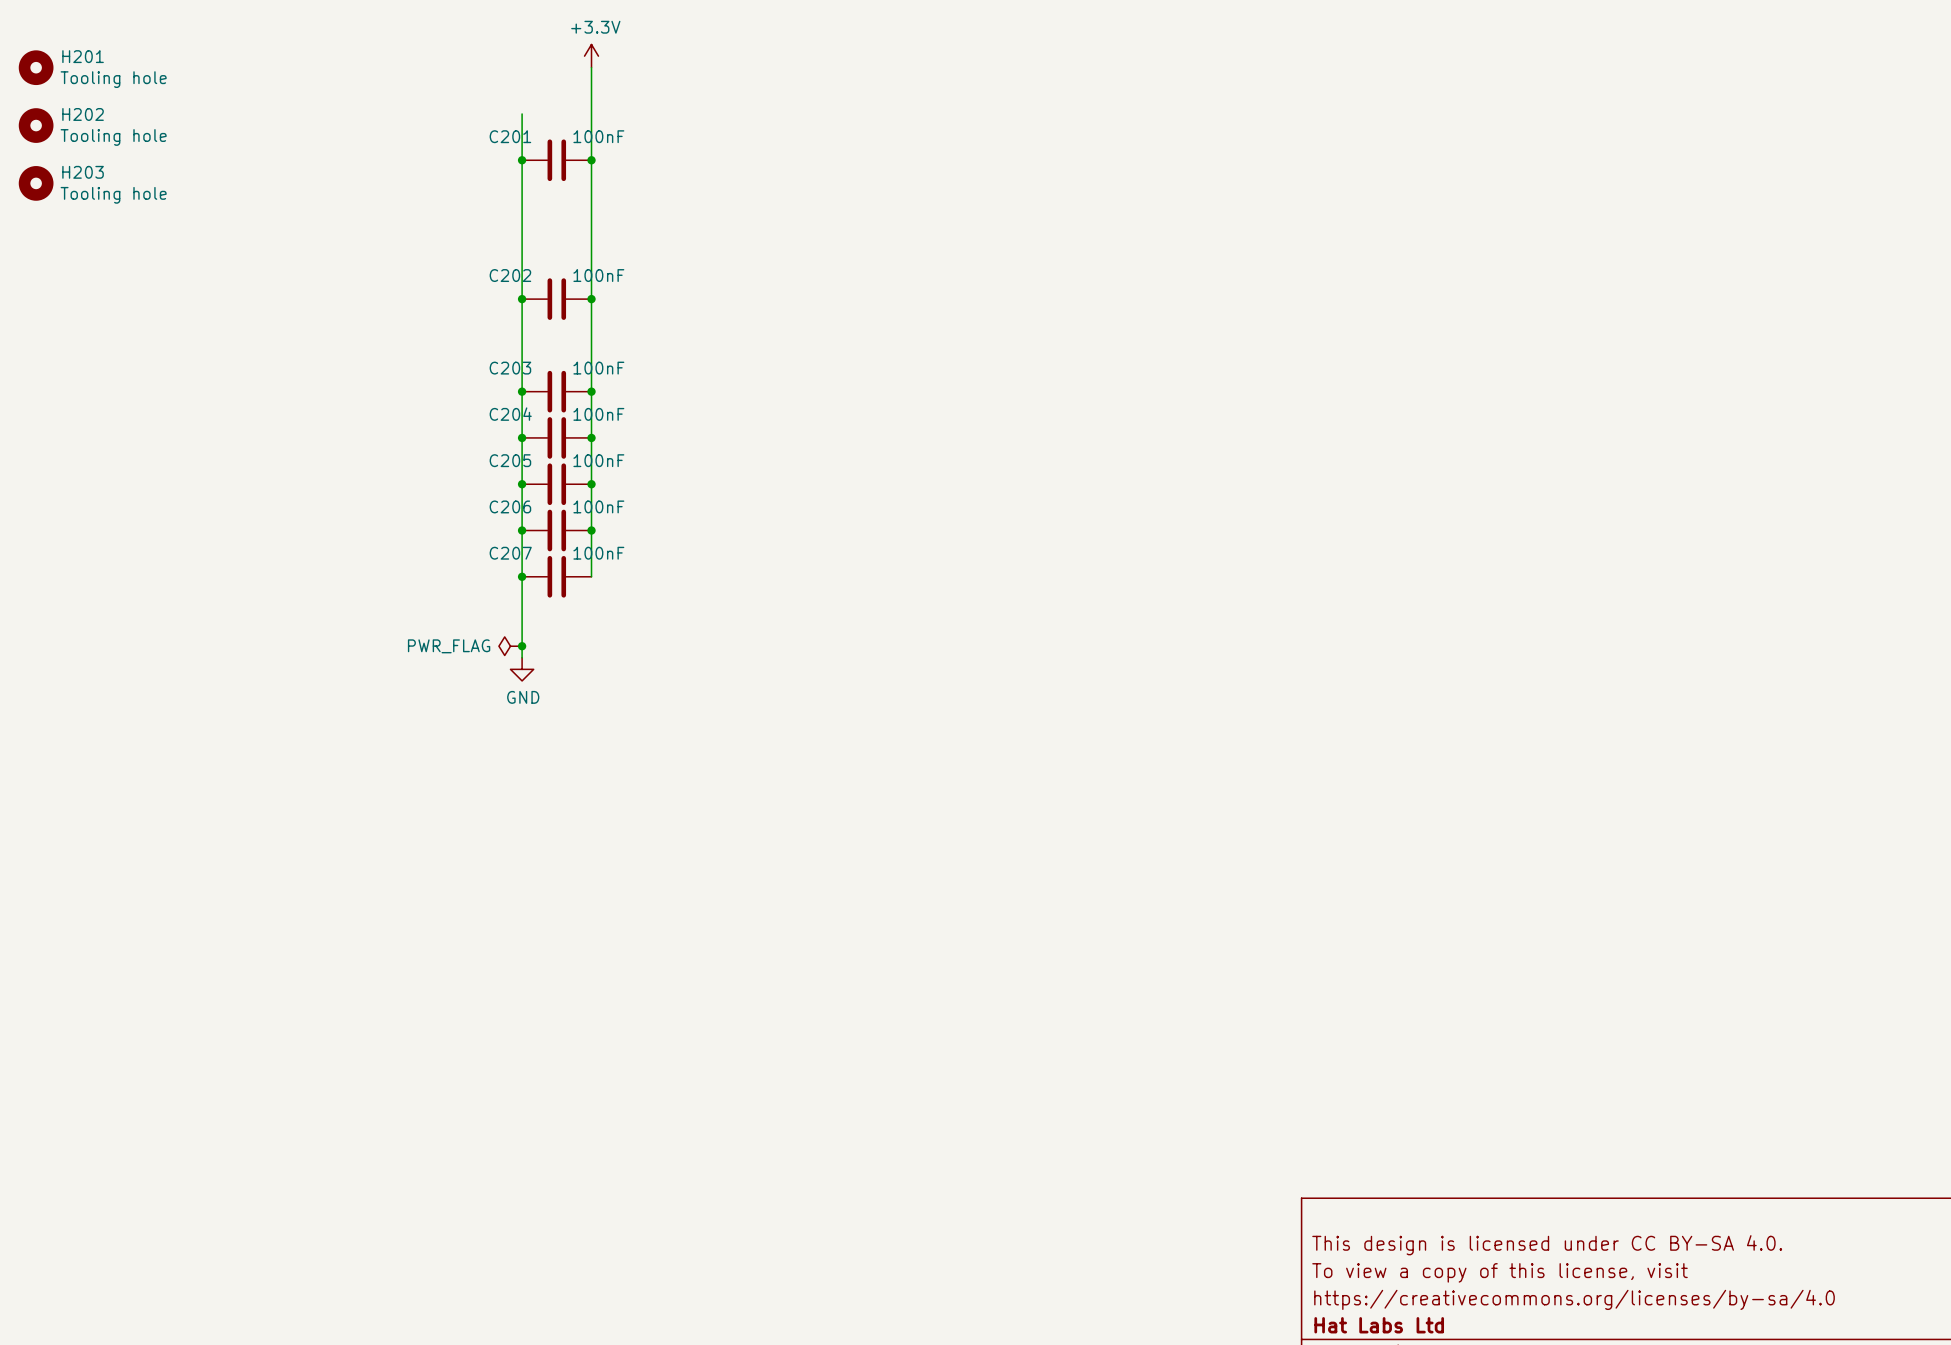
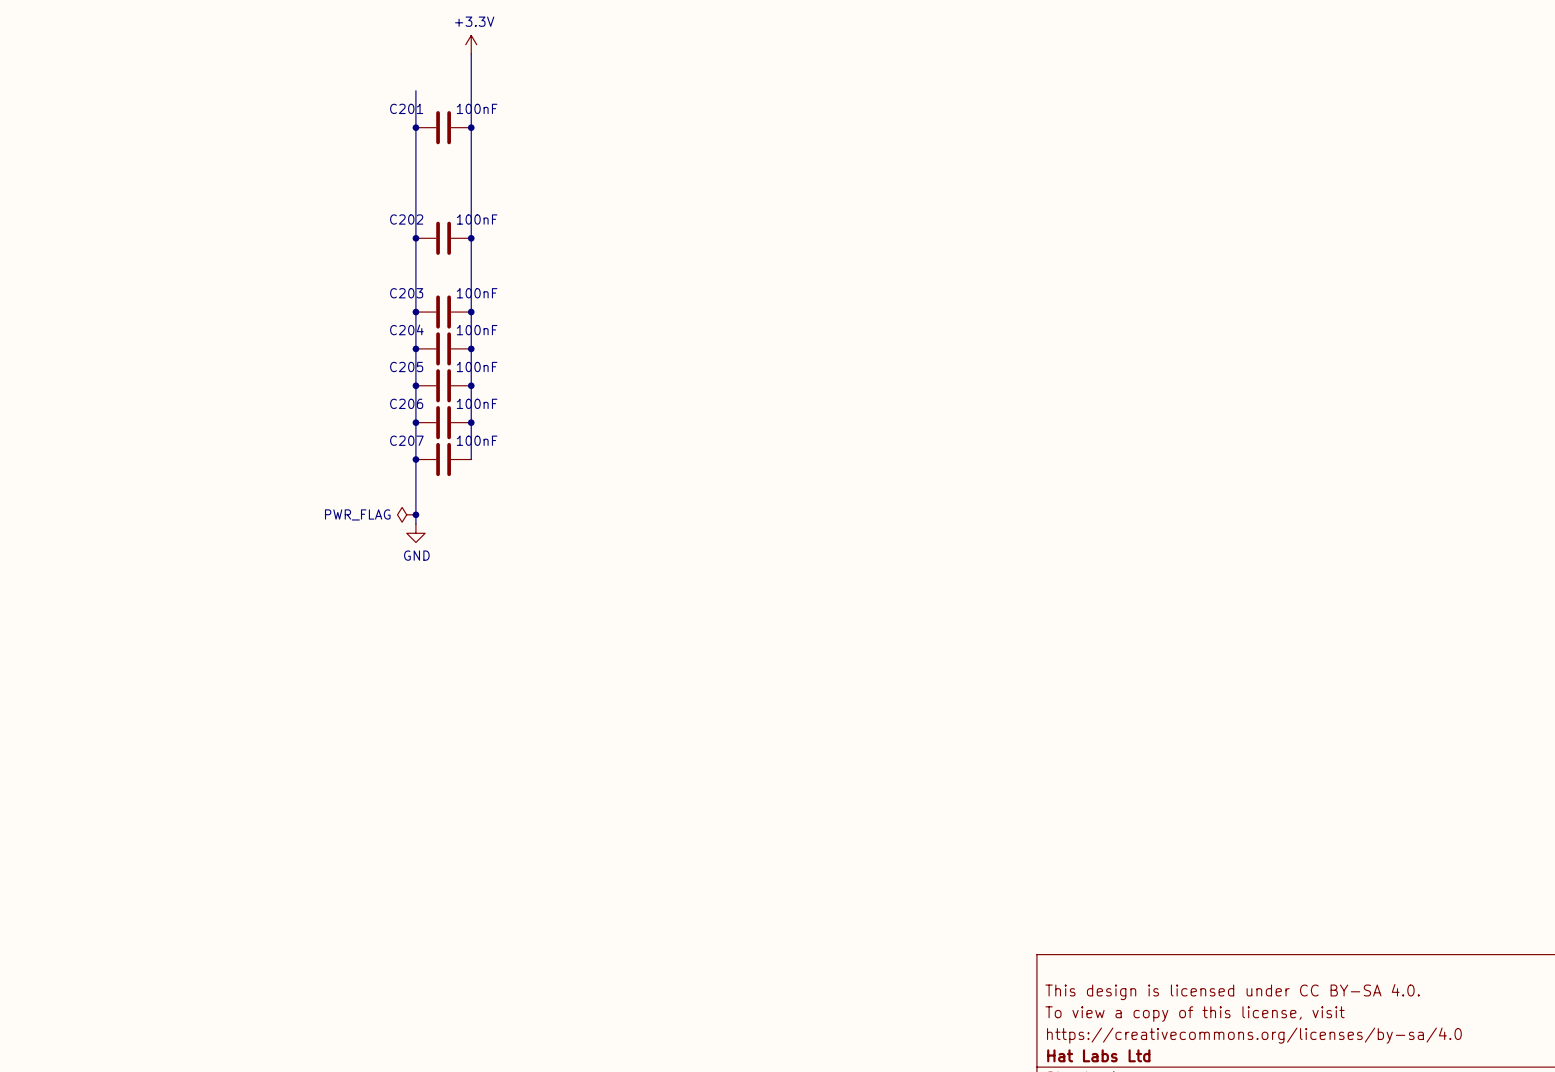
H201: Tooling hole (36, 67) -> none
H202: Tooling hole (36, 125) -> none
H203: Tooling hole (36, 183) -> none

